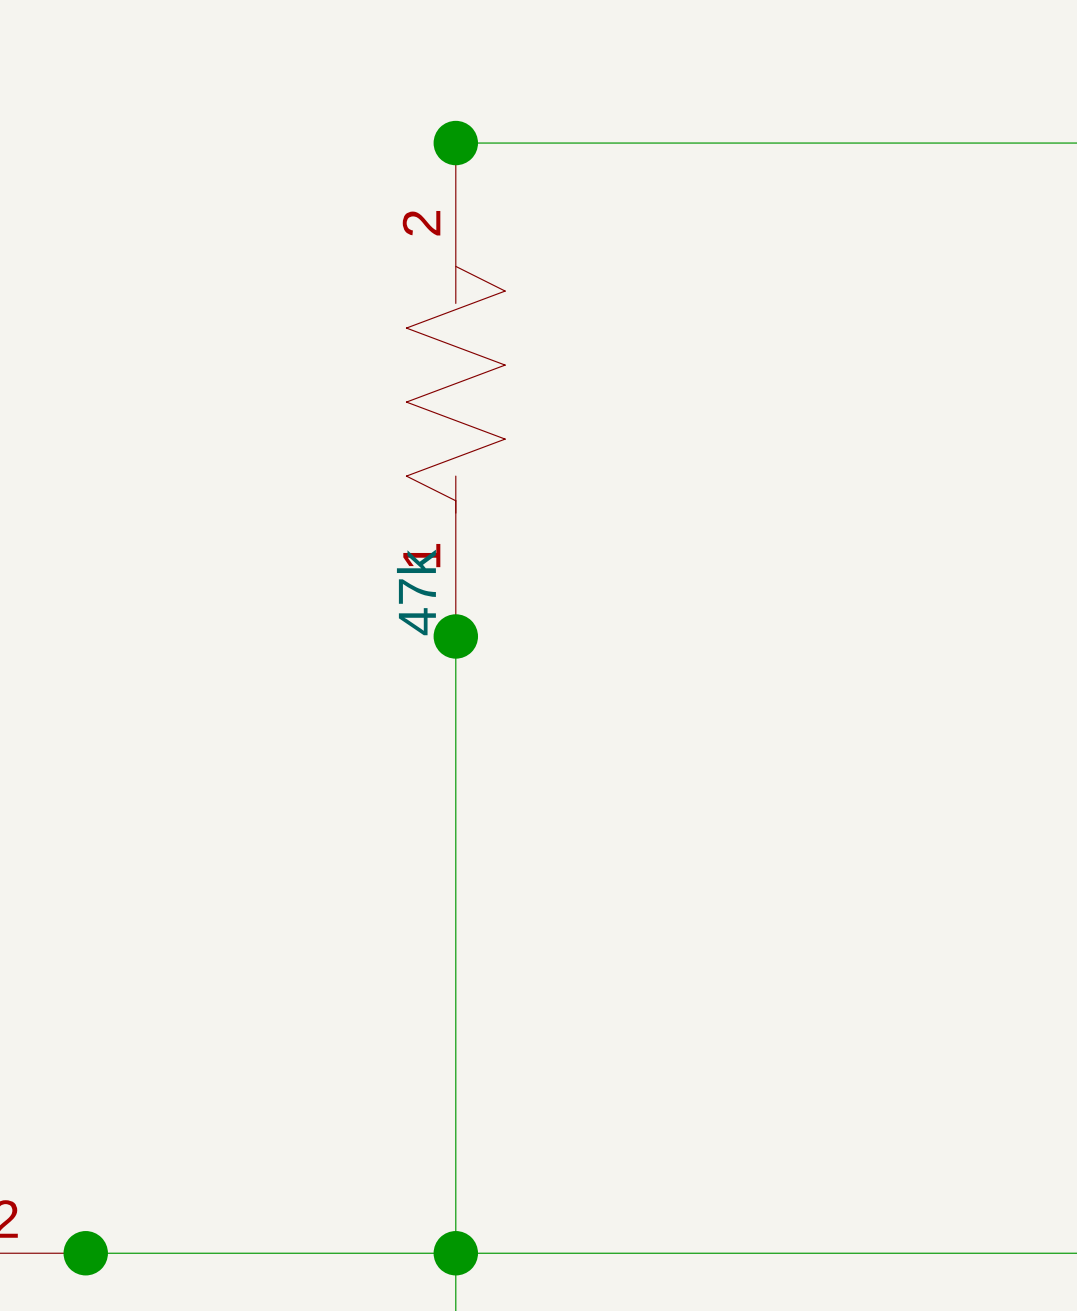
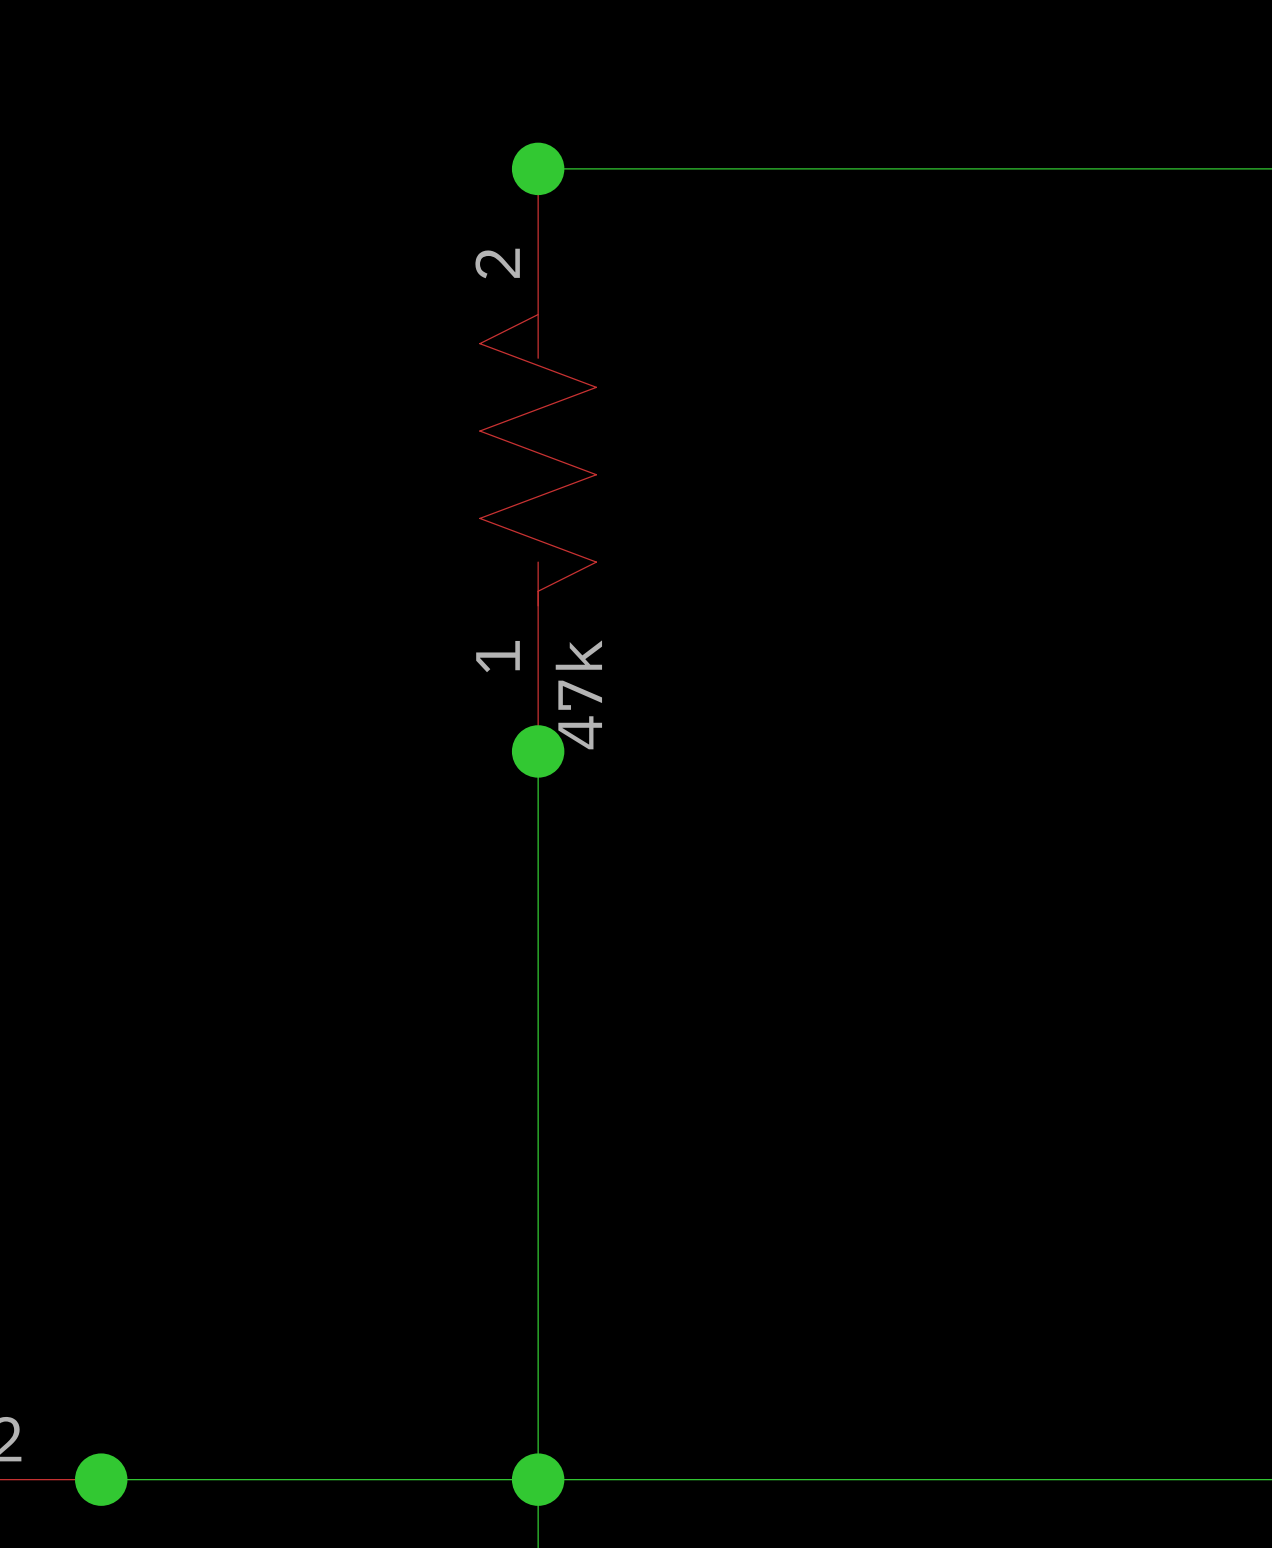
part flip: as is (455, 389) -> left-right (538, 460)

